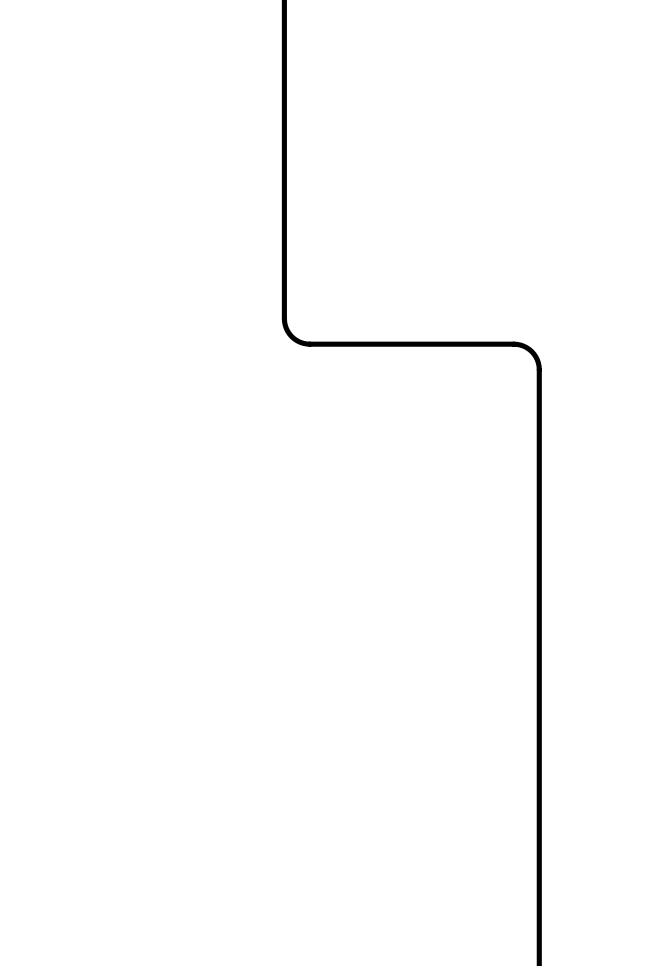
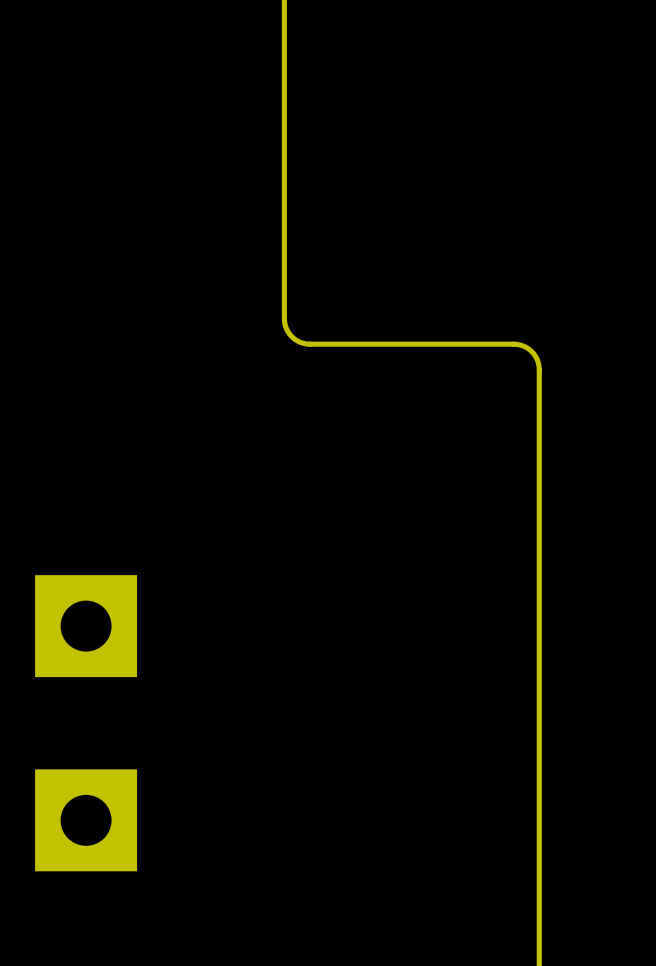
part: none -> (86, 626)
part: none -> (86, 820)

